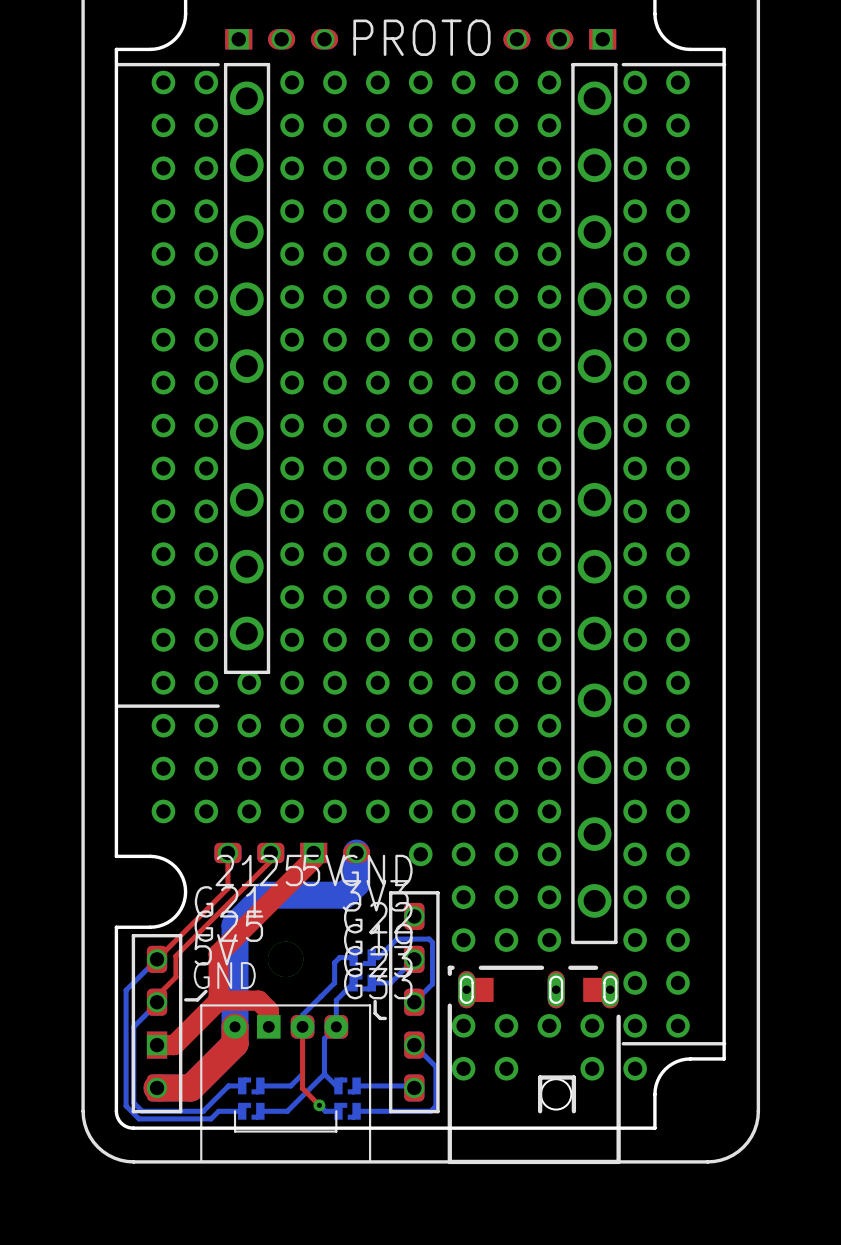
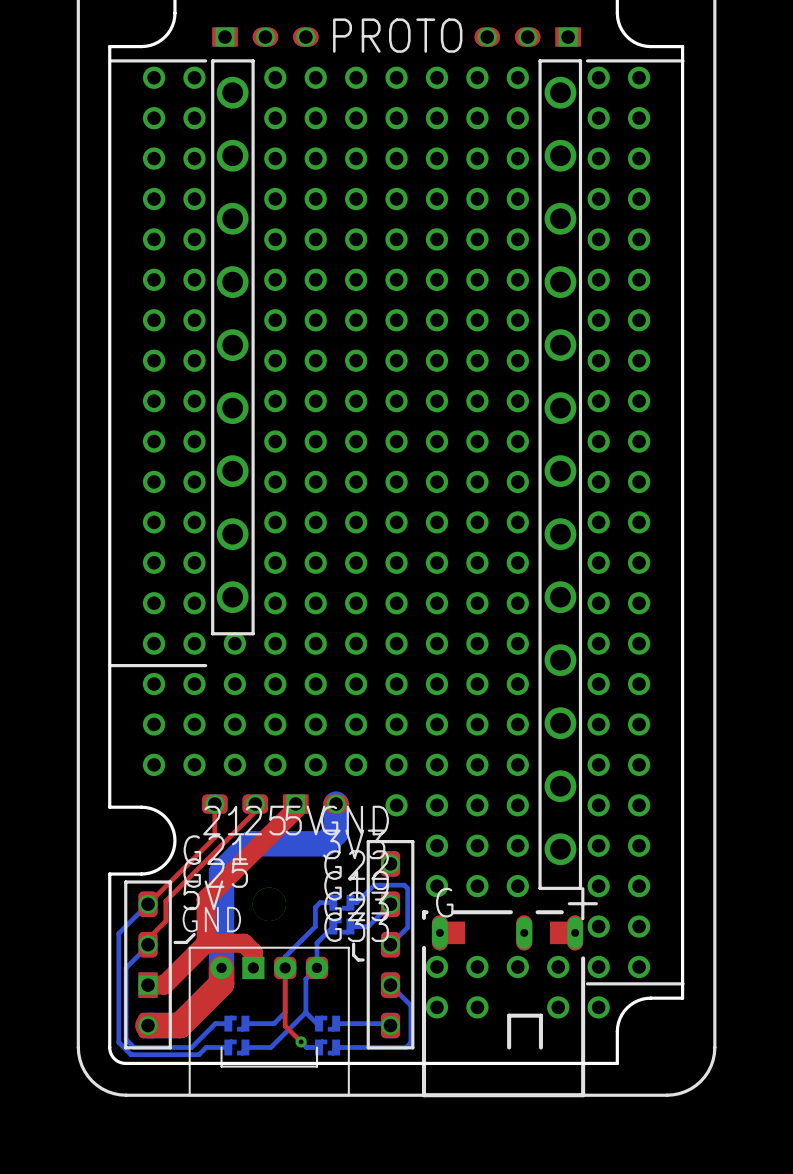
text: none -> G (444, 902)
text: none -> + (582, 903)
part footprint: [447, 965, 621, 1165] -> [421, 910, 586, 1098]

